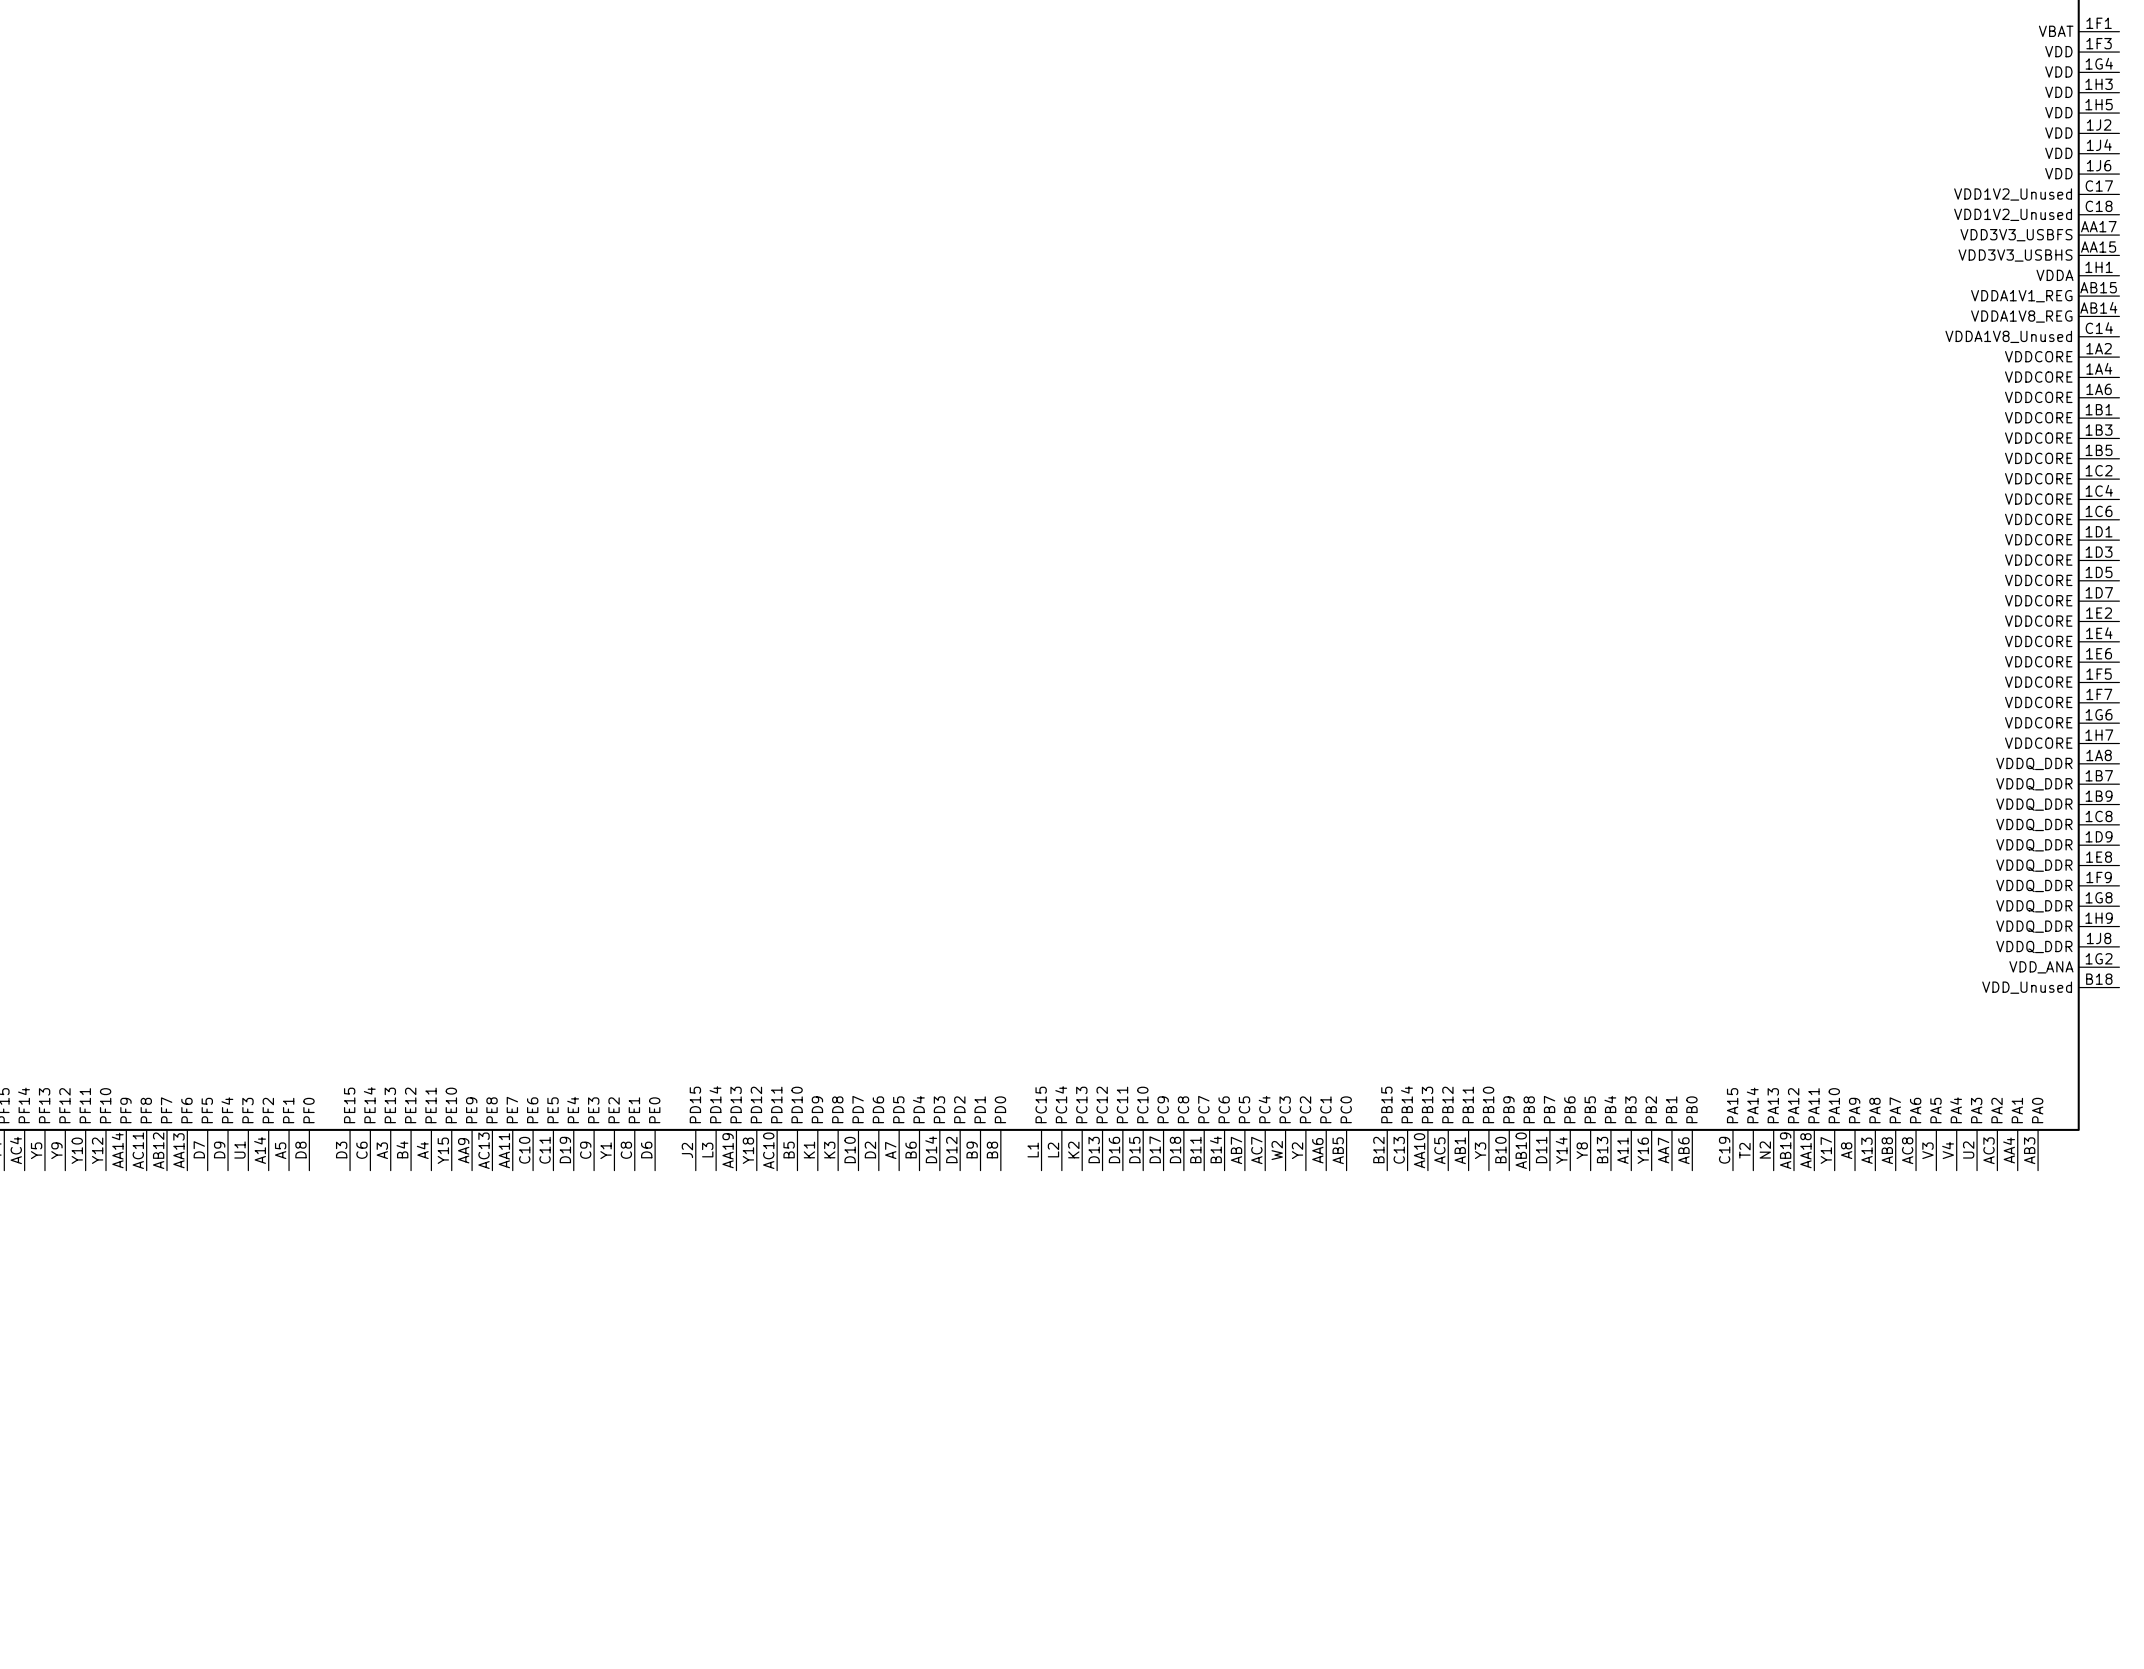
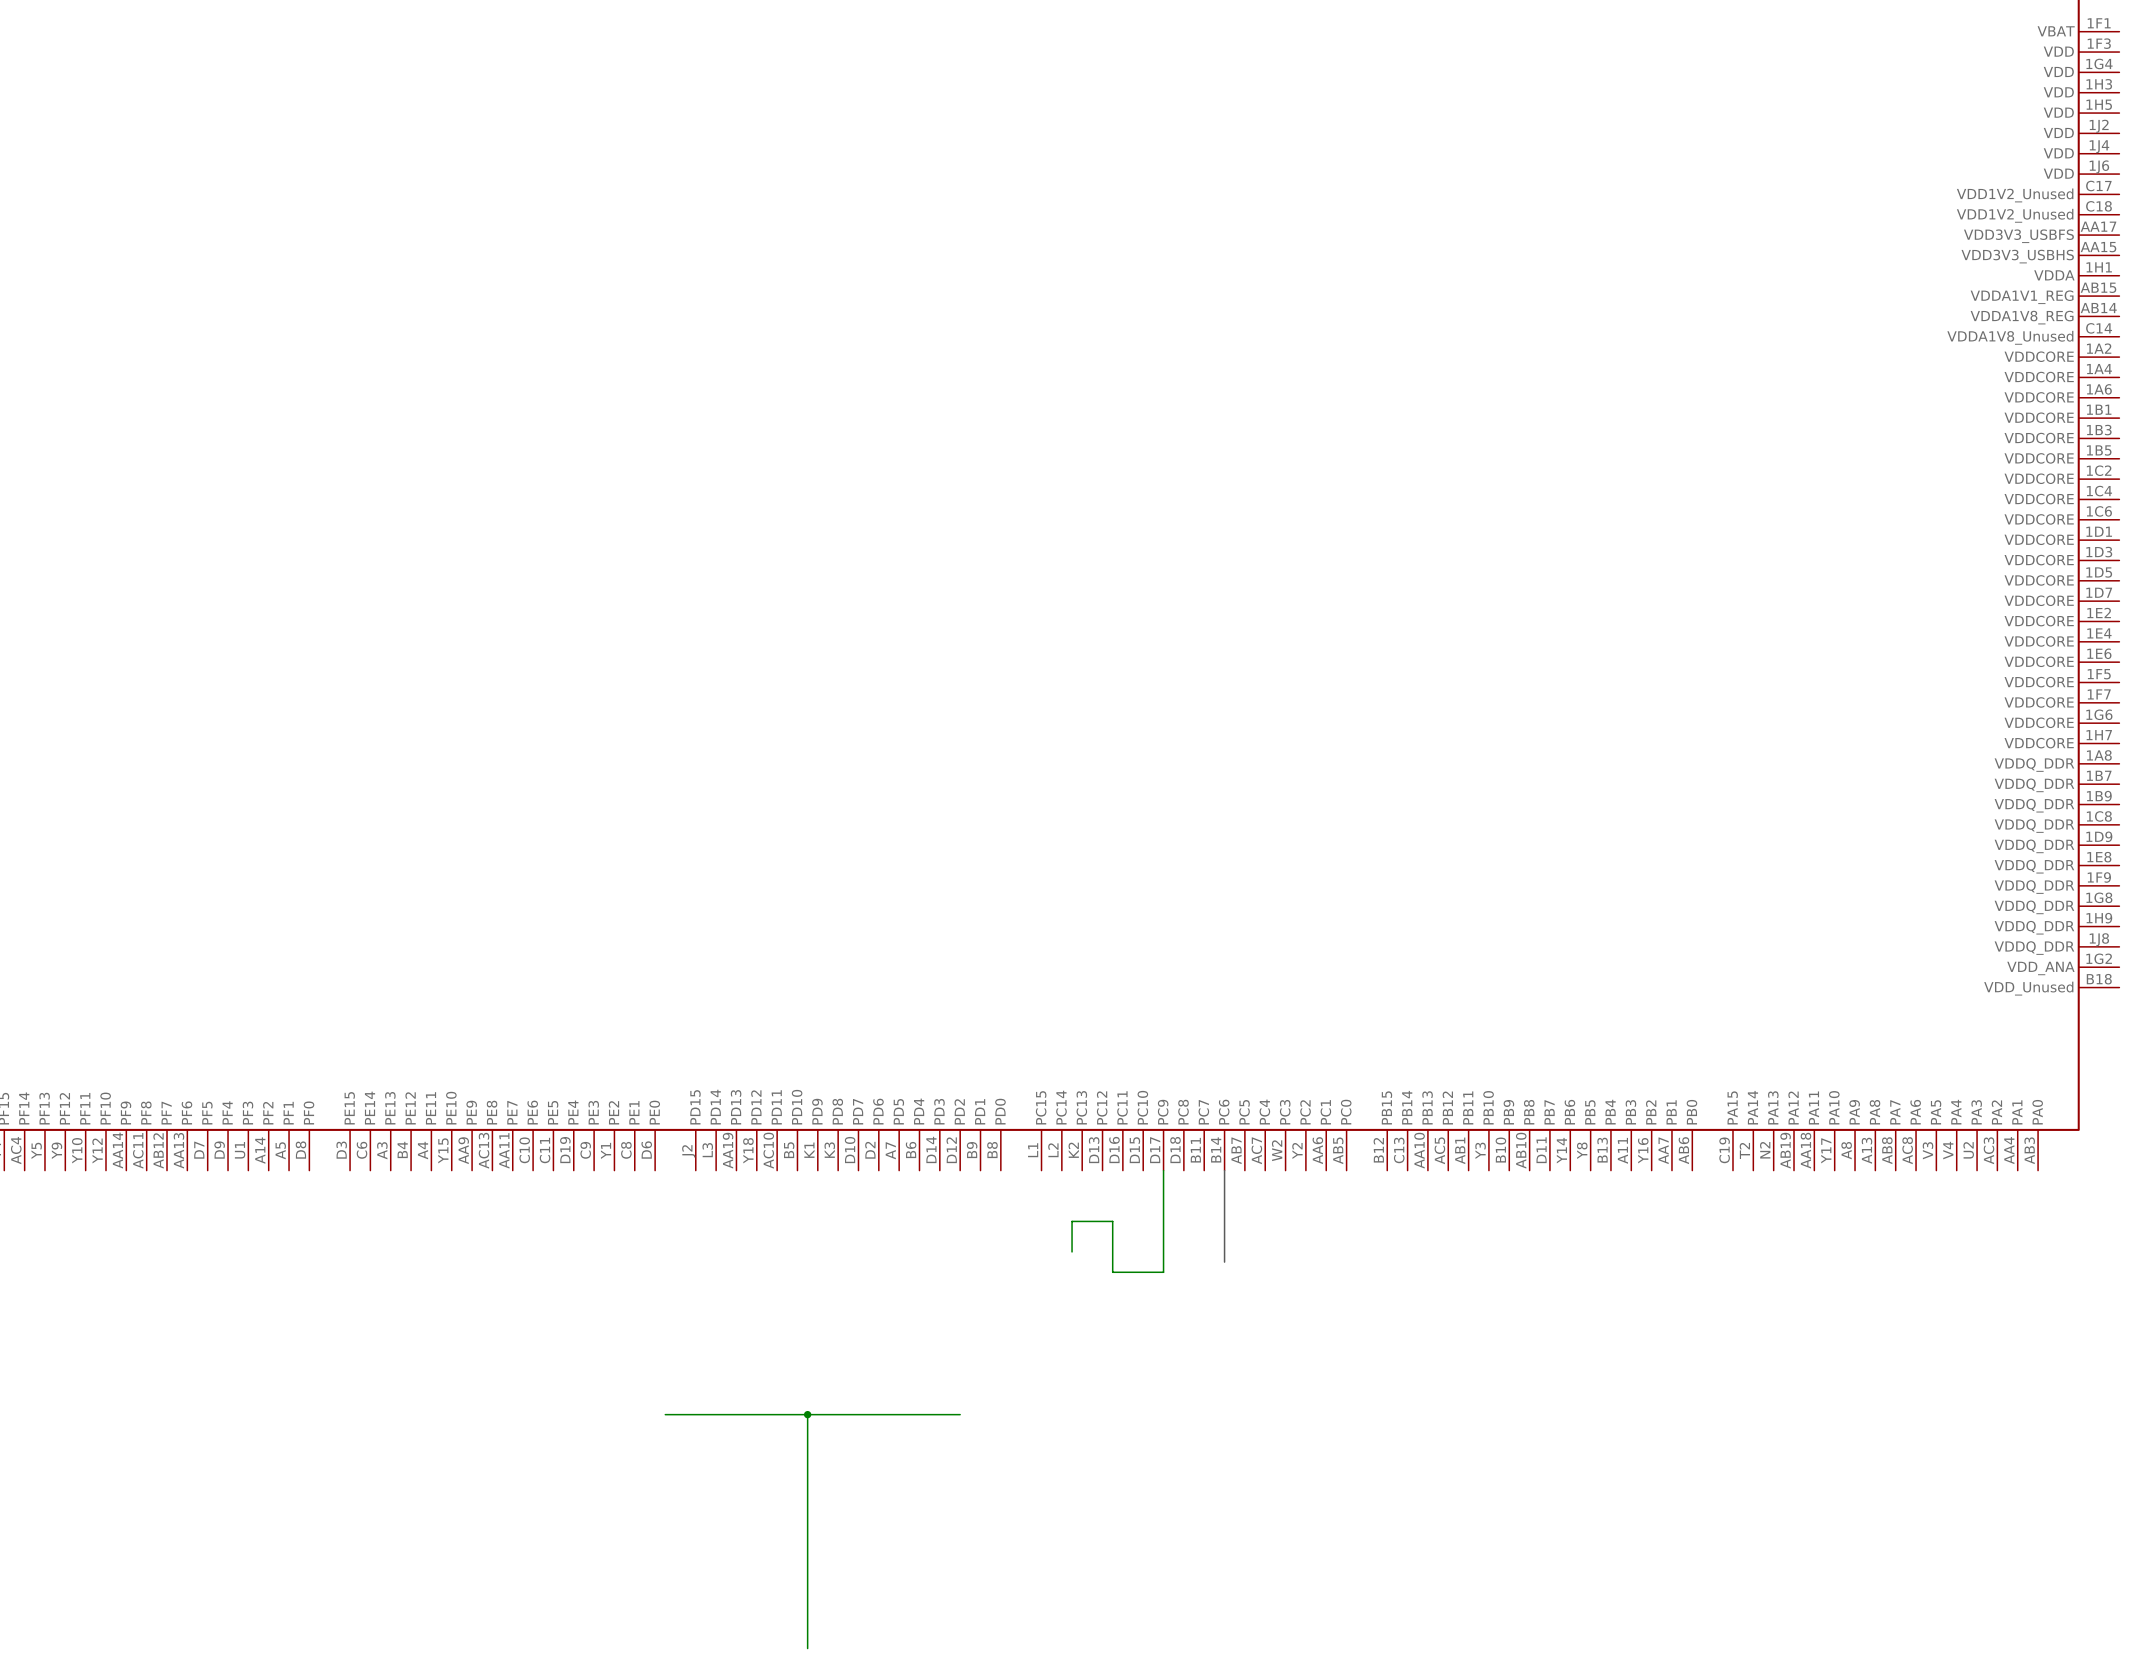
wire: none -> (1163, 1170) (1163, 1272) (1112, 1272) (1112, 1221) (1072, 1221) (1072, 1251)
bus: none -> (1224, 1170) (1224, 1262)
wire: none -> (665, 1414) (960, 1414)
wire: none -> (807, 1414) (807, 1648)
junction: none -> (807, 1414)

